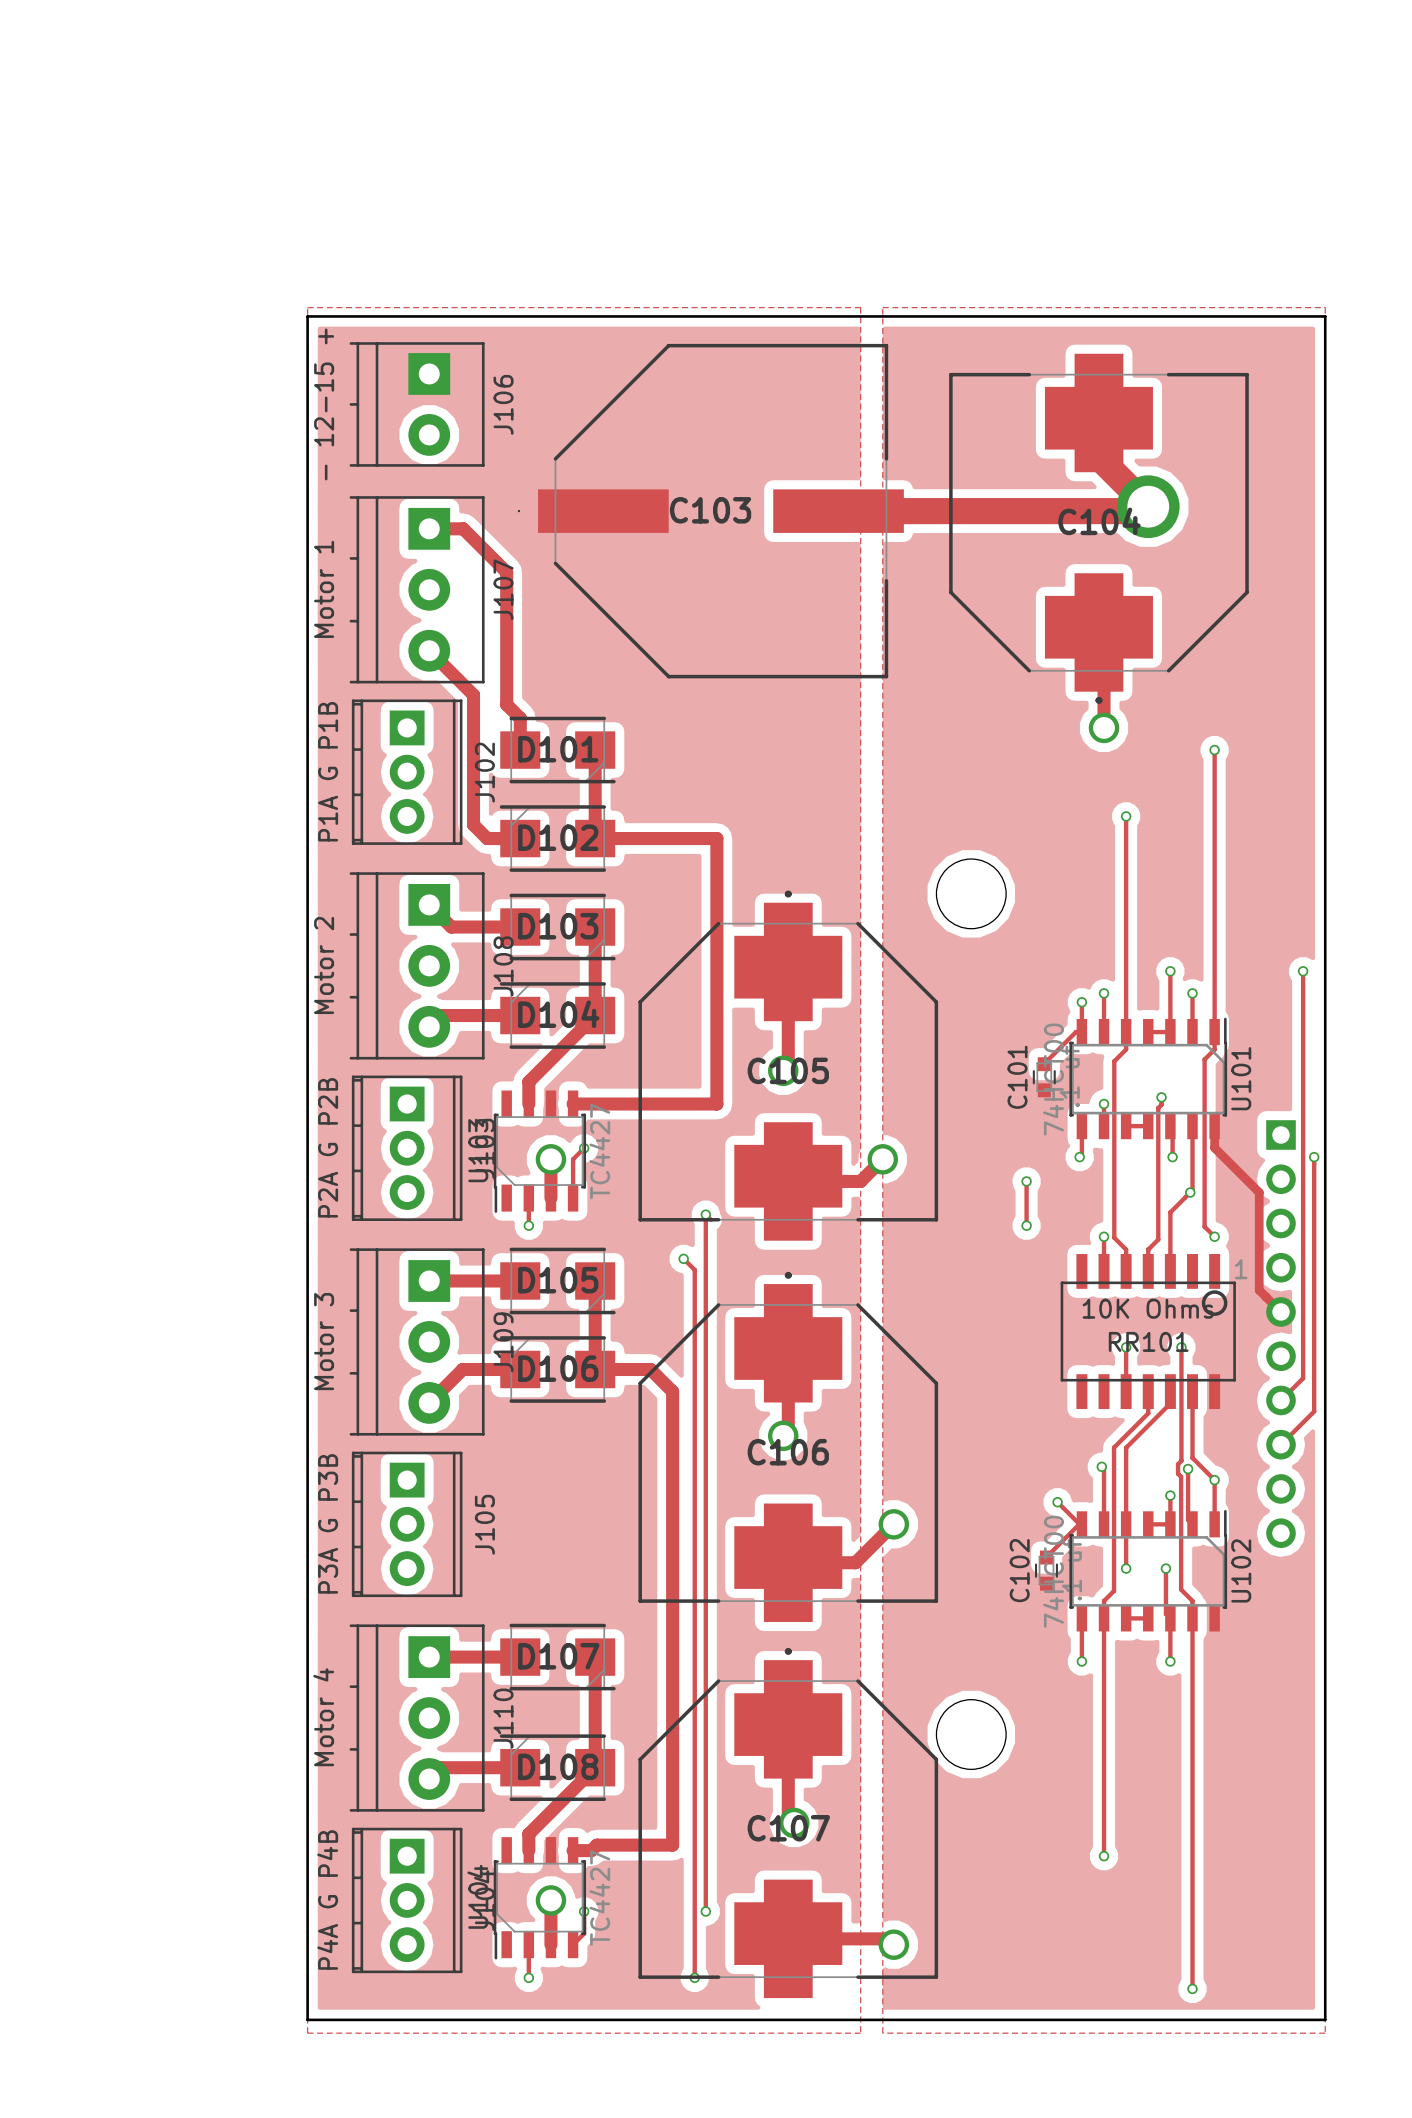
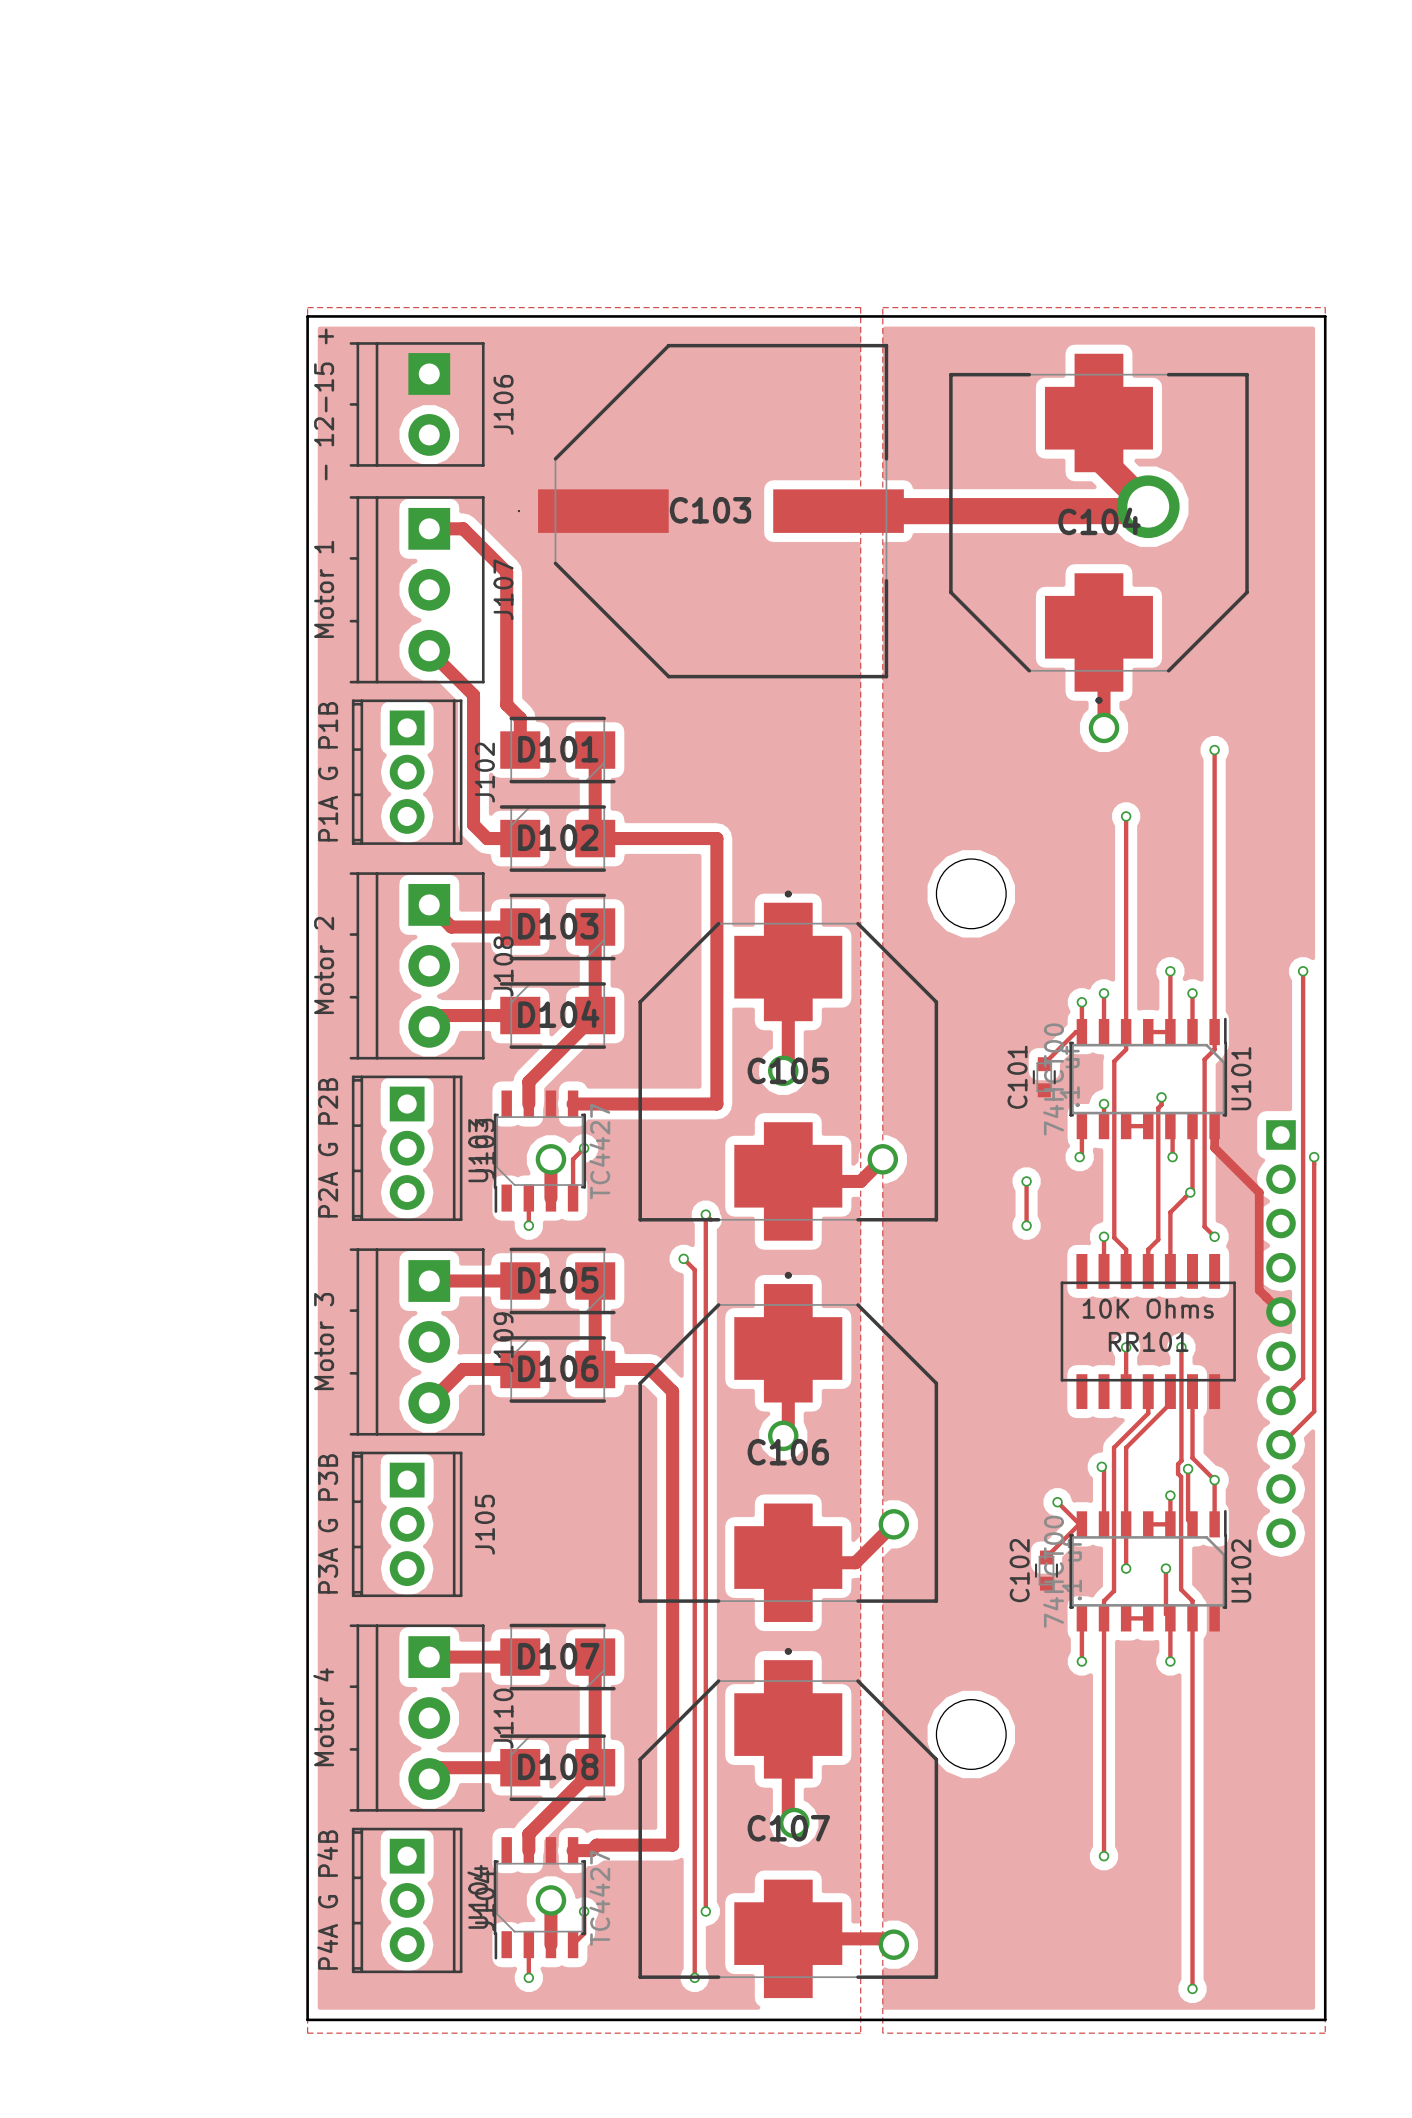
text: 1 (1241, 1269) -> none
drawing: [1201, 1290, 1228, 1316] -> none

